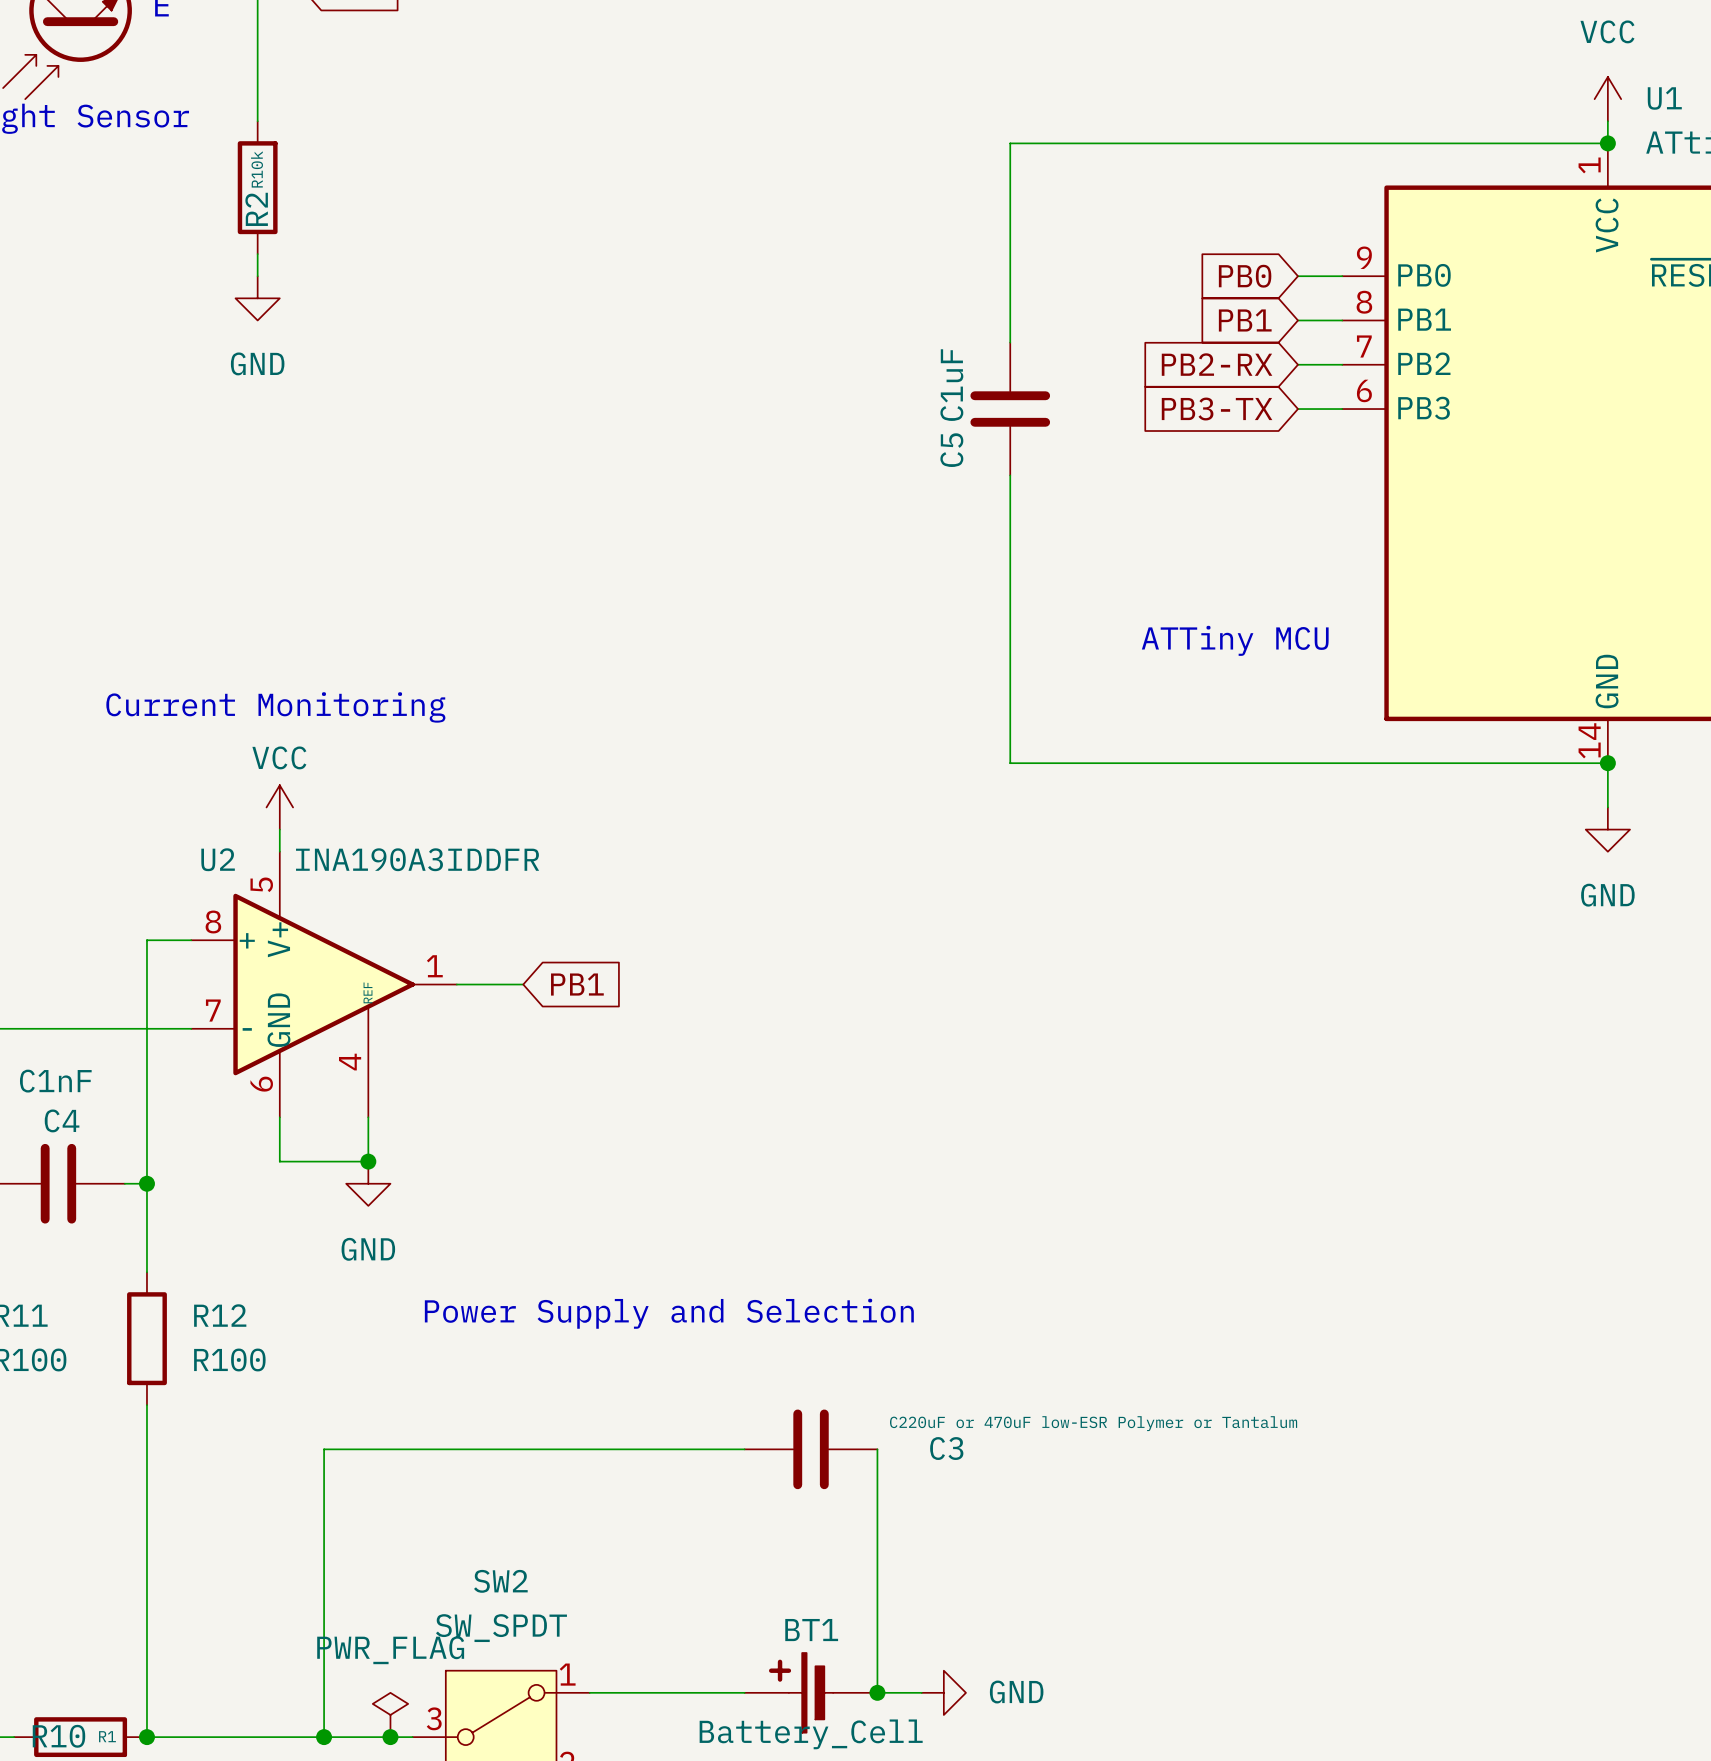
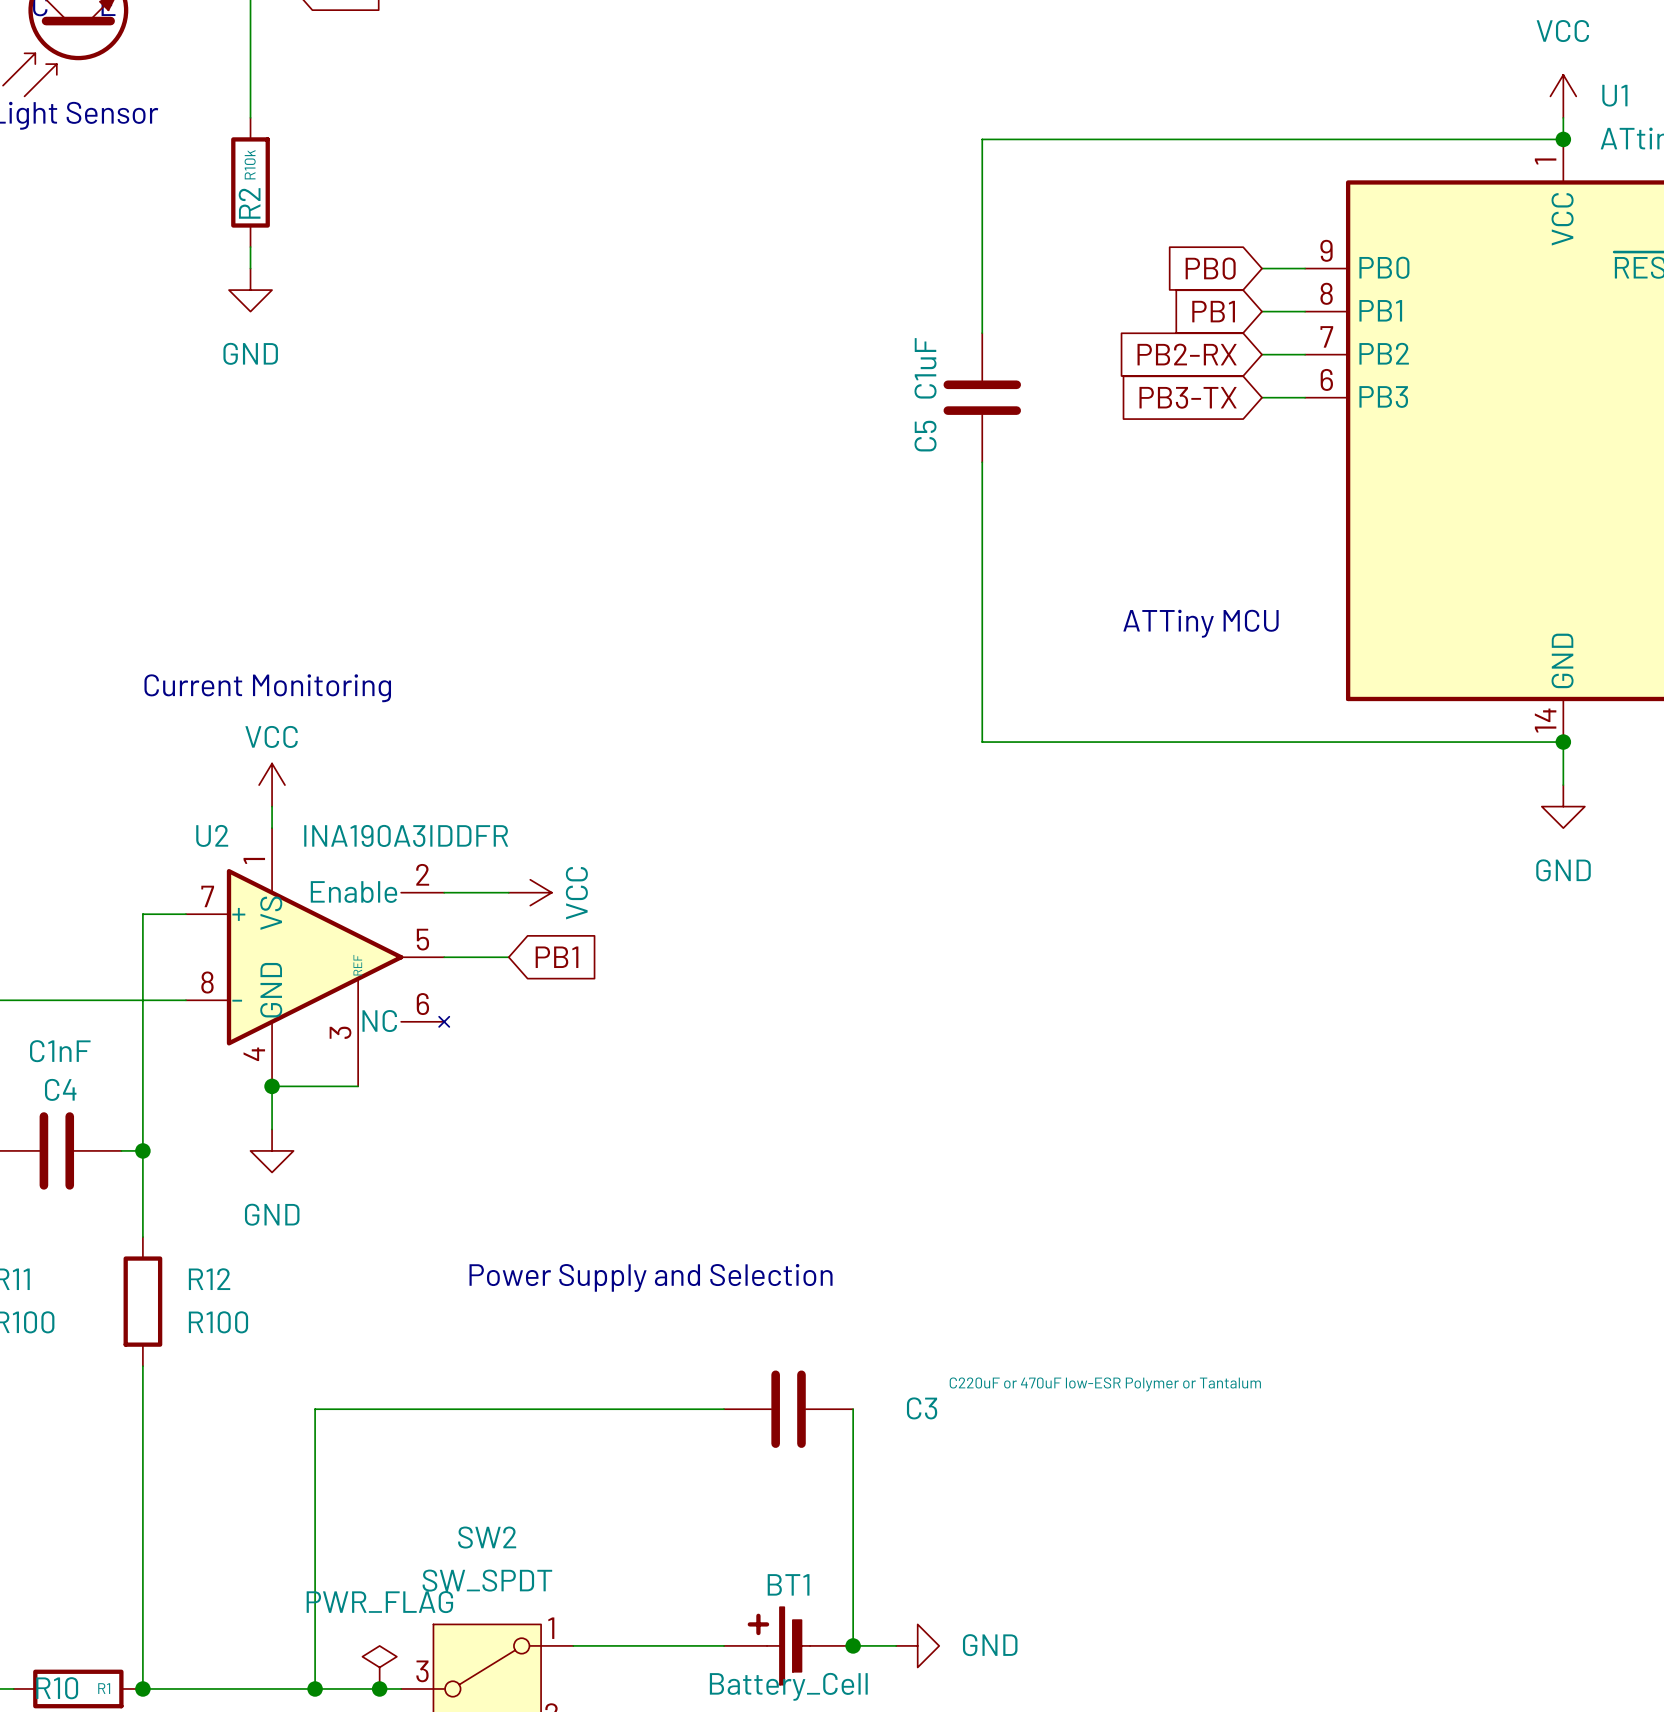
U2 symbol: [191, 851, 457, 1118] -> [185, 828, 450, 1087]
wire: none -> (444, 892) (508, 892)
power symbol: none -> VCC (530, 892)
wire: (368, 1117) (368, 1161) (279, 1161) -> (358, 1086) (272, 1086)
junction position: (368, 1161) -> (272, 1086)
power symbol position: GND (368, 1183) -> GND (272, 1150)

